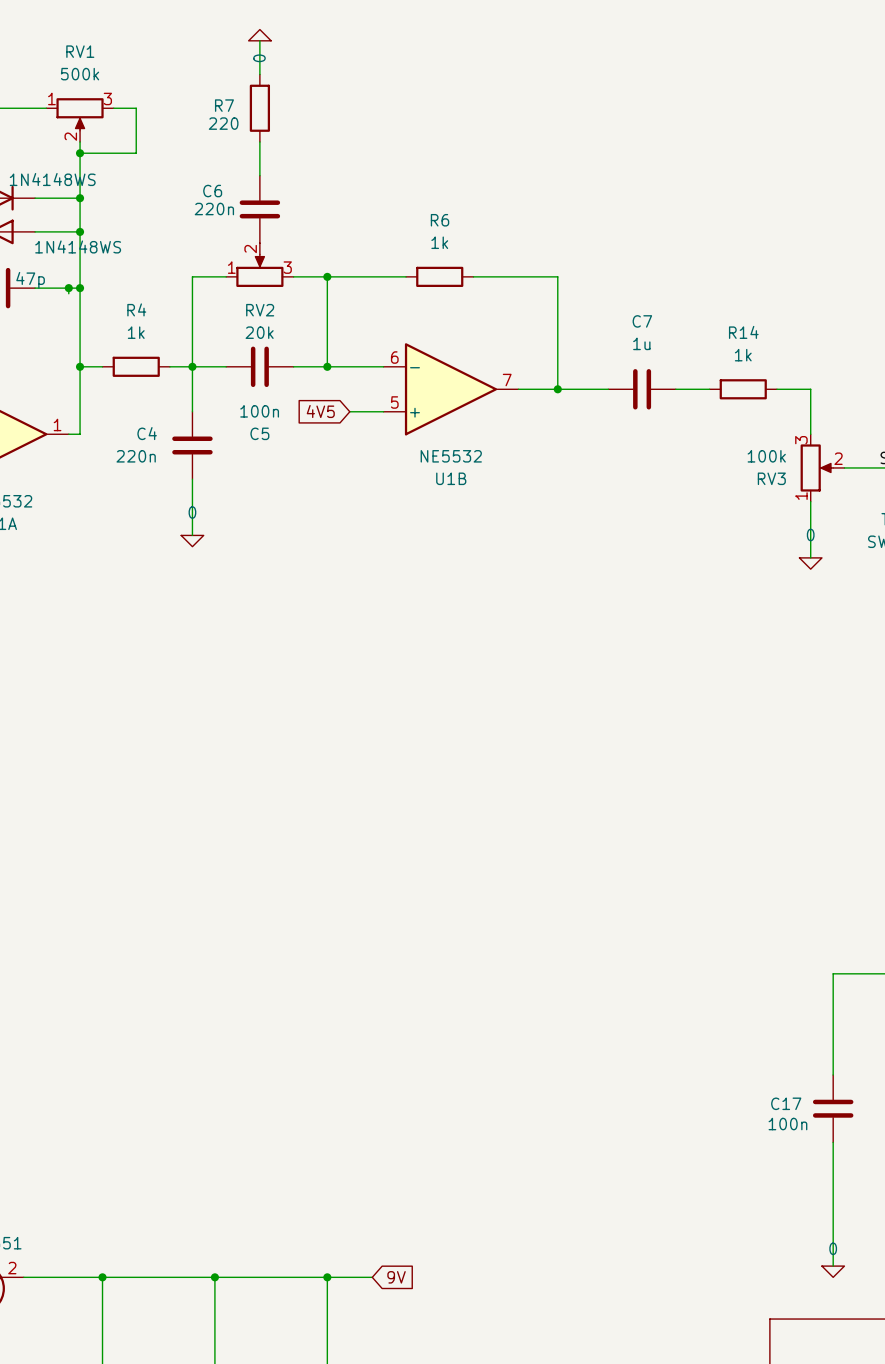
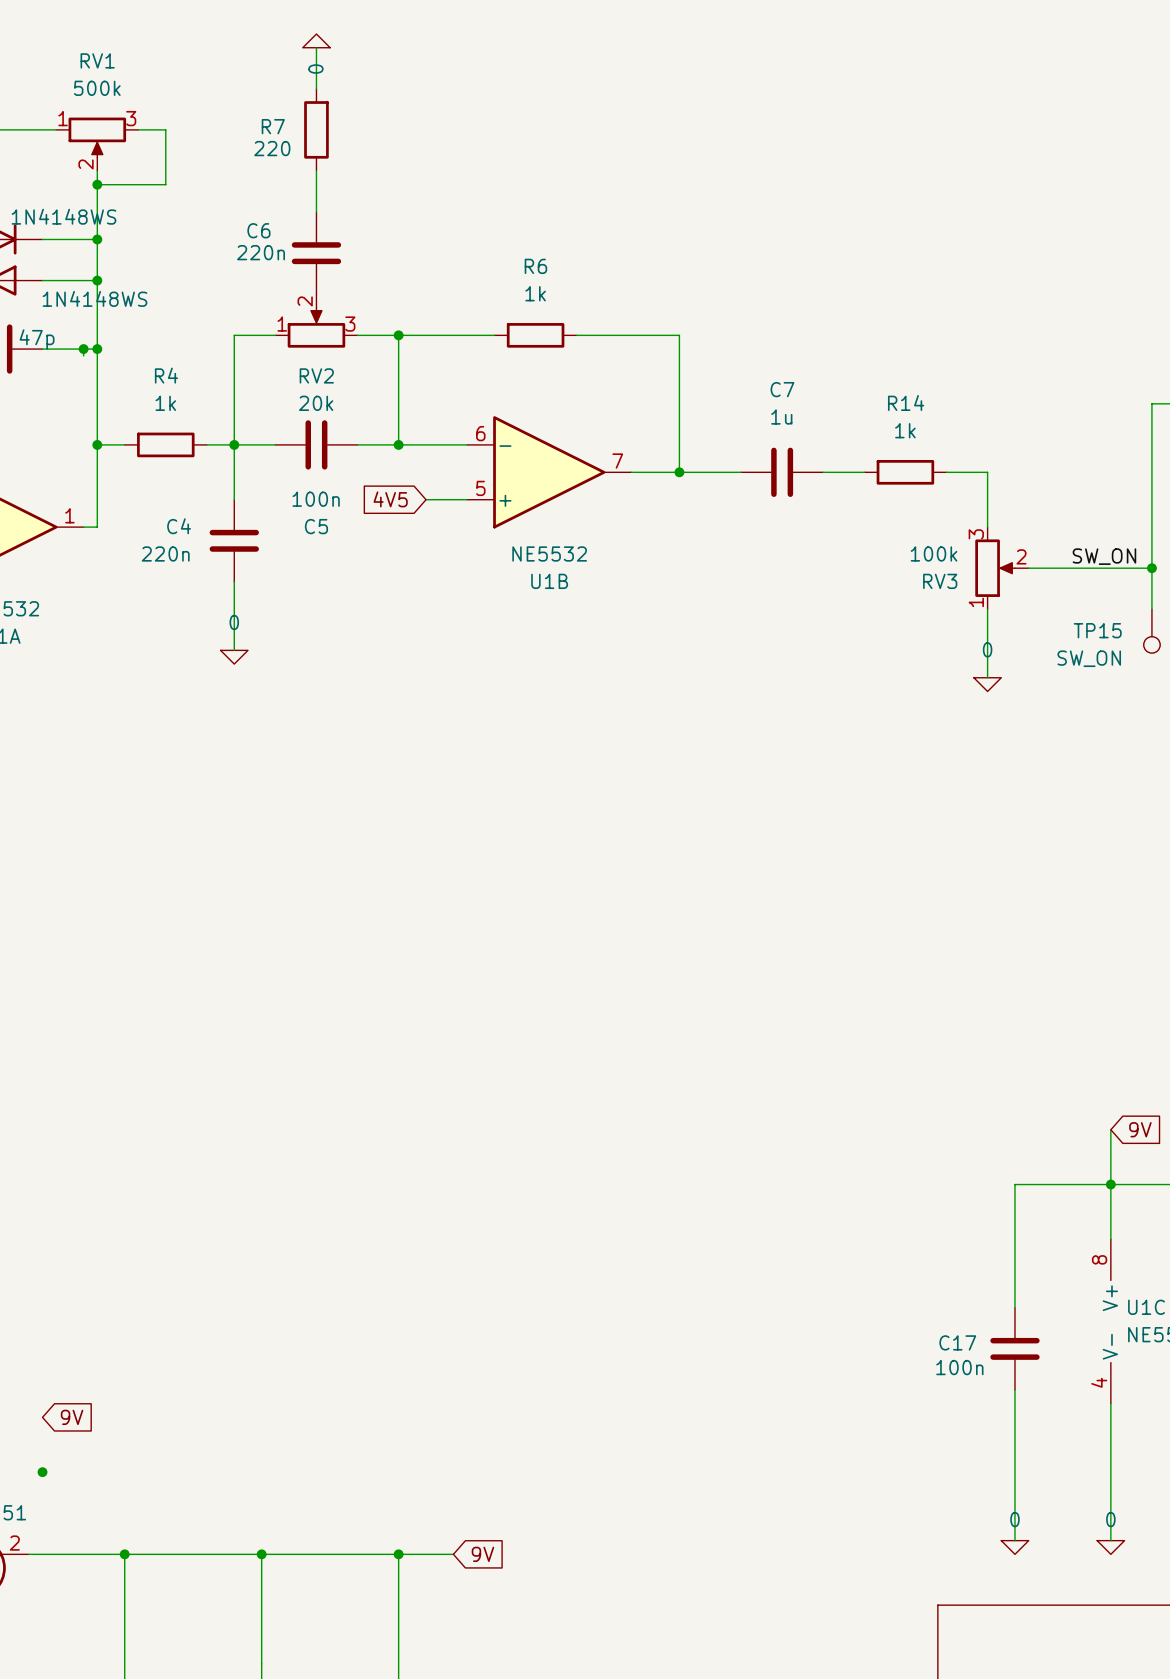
global label: none -> 9V (72, 1417)
junction: none -> (42, 1472)

